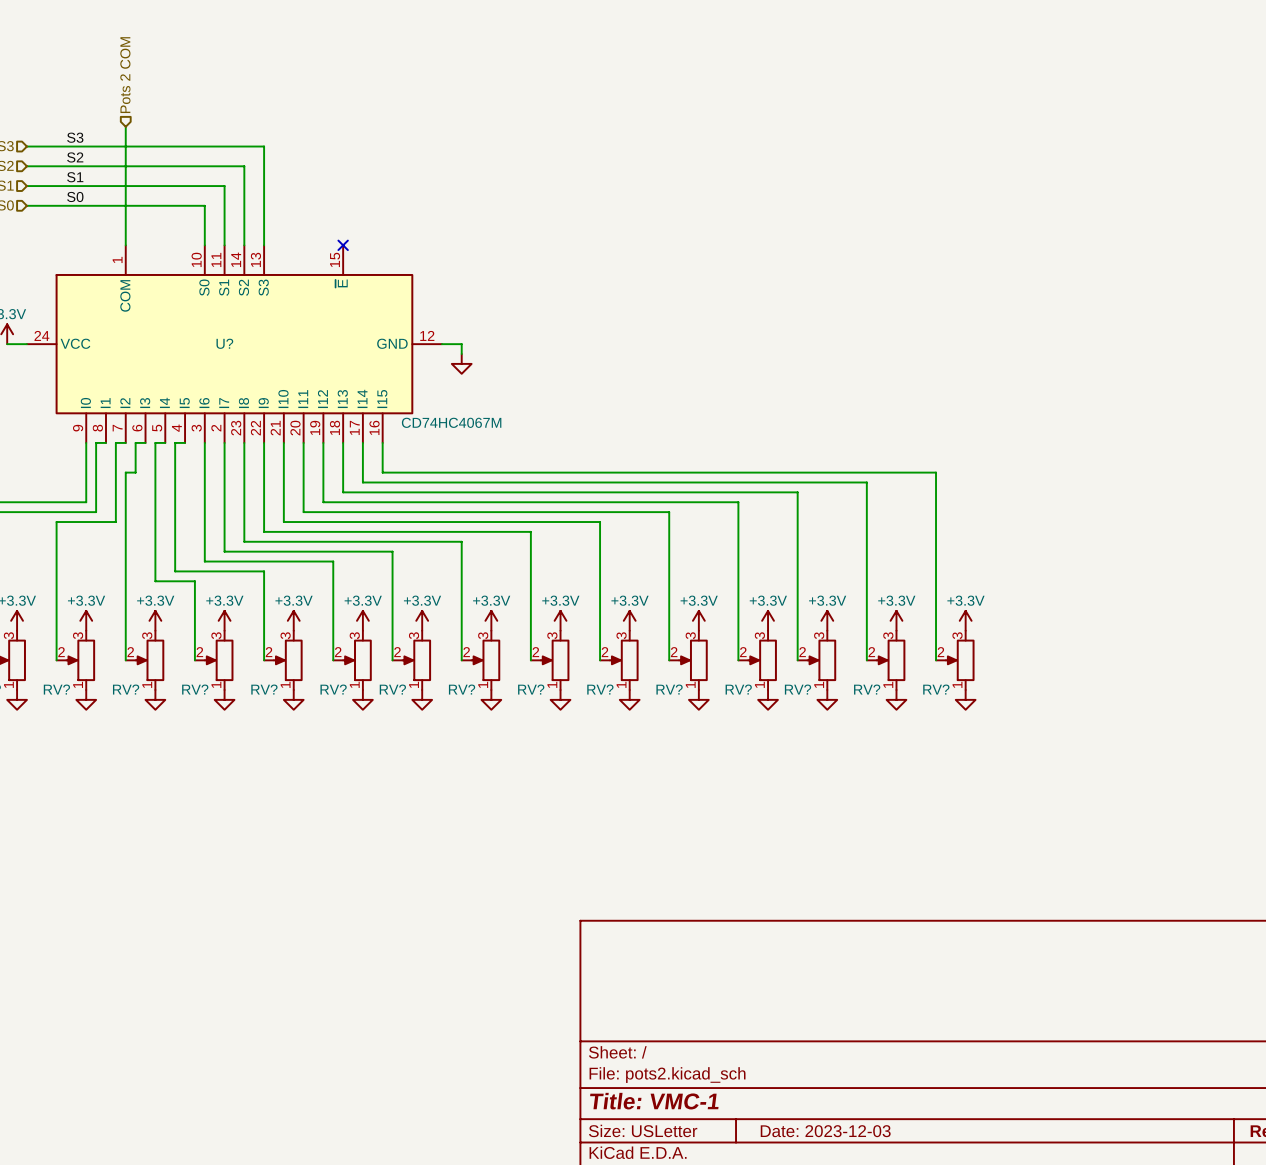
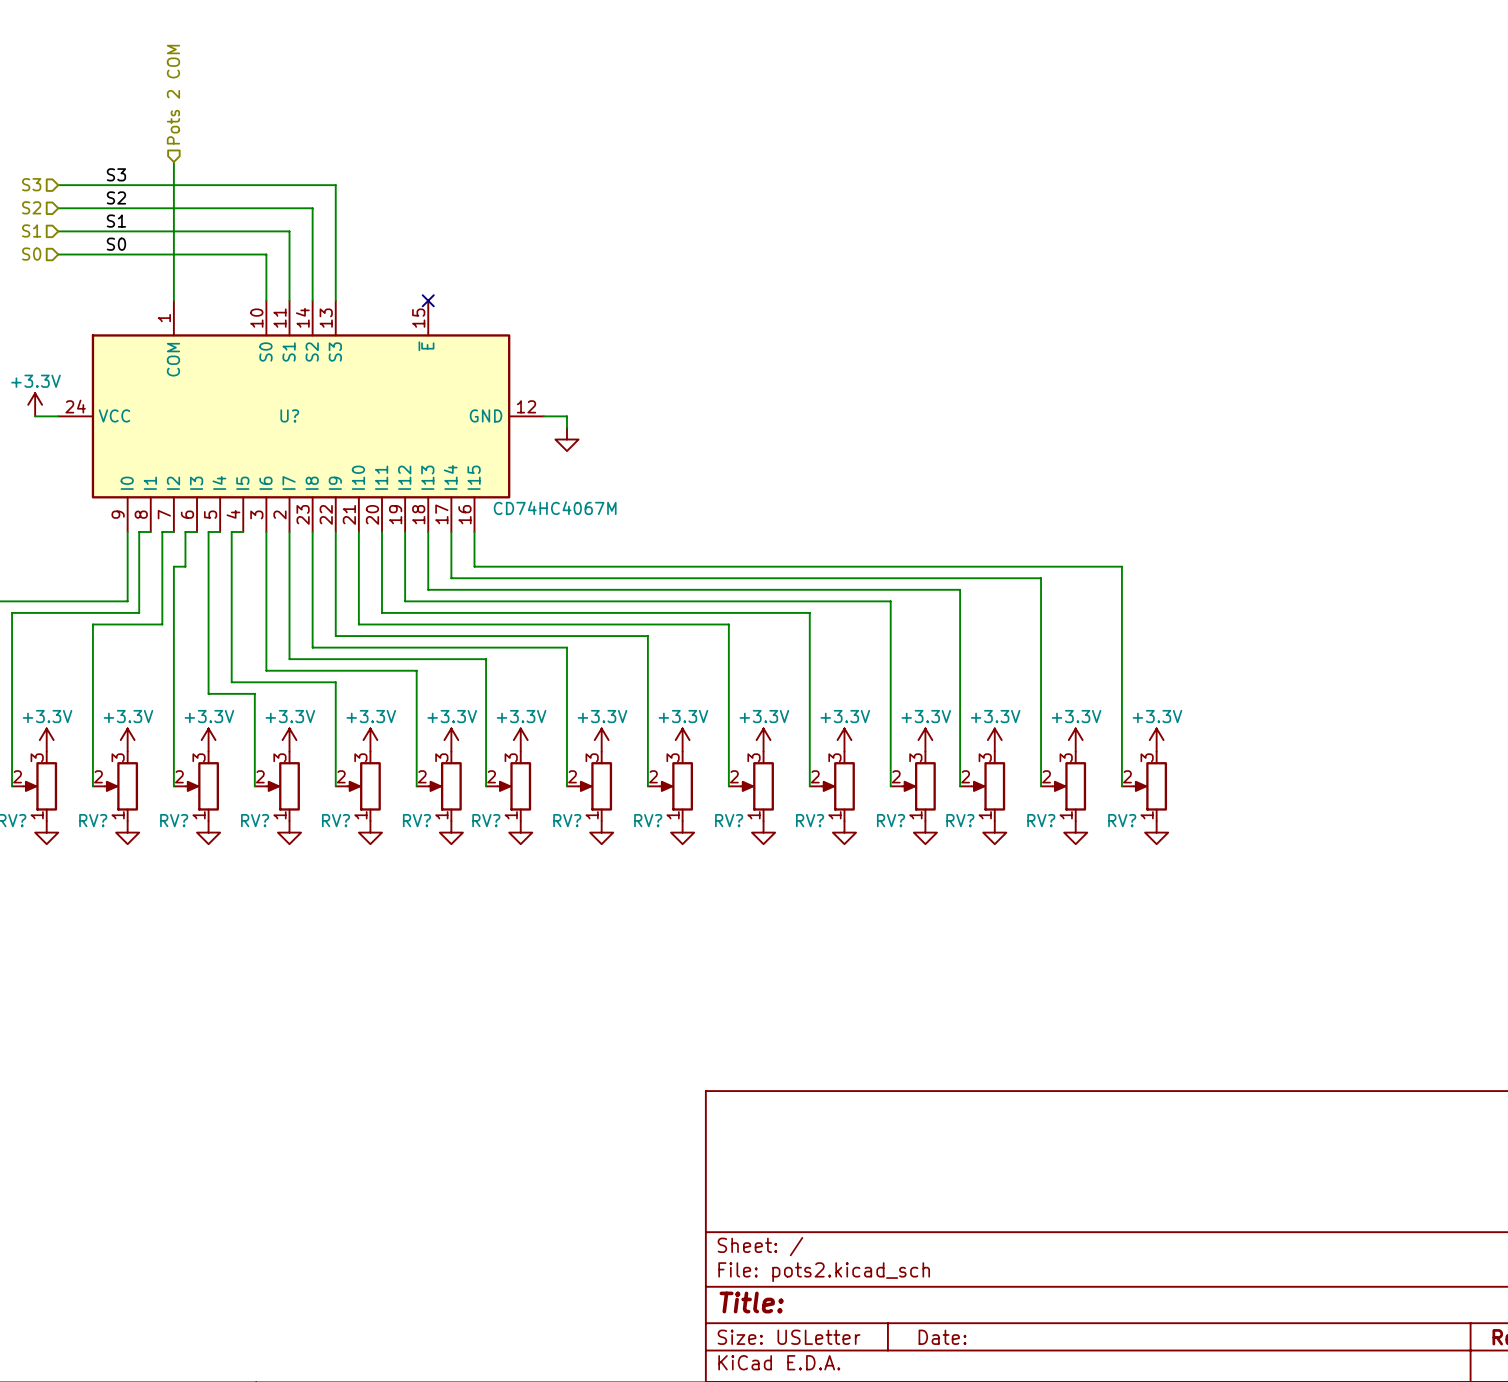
title block: Title: VMC-1 (654, 1101) -> Title: (751, 1302)
title block: Date: 2023-12-03 (825, 1131) -> Date: (942, 1337)

